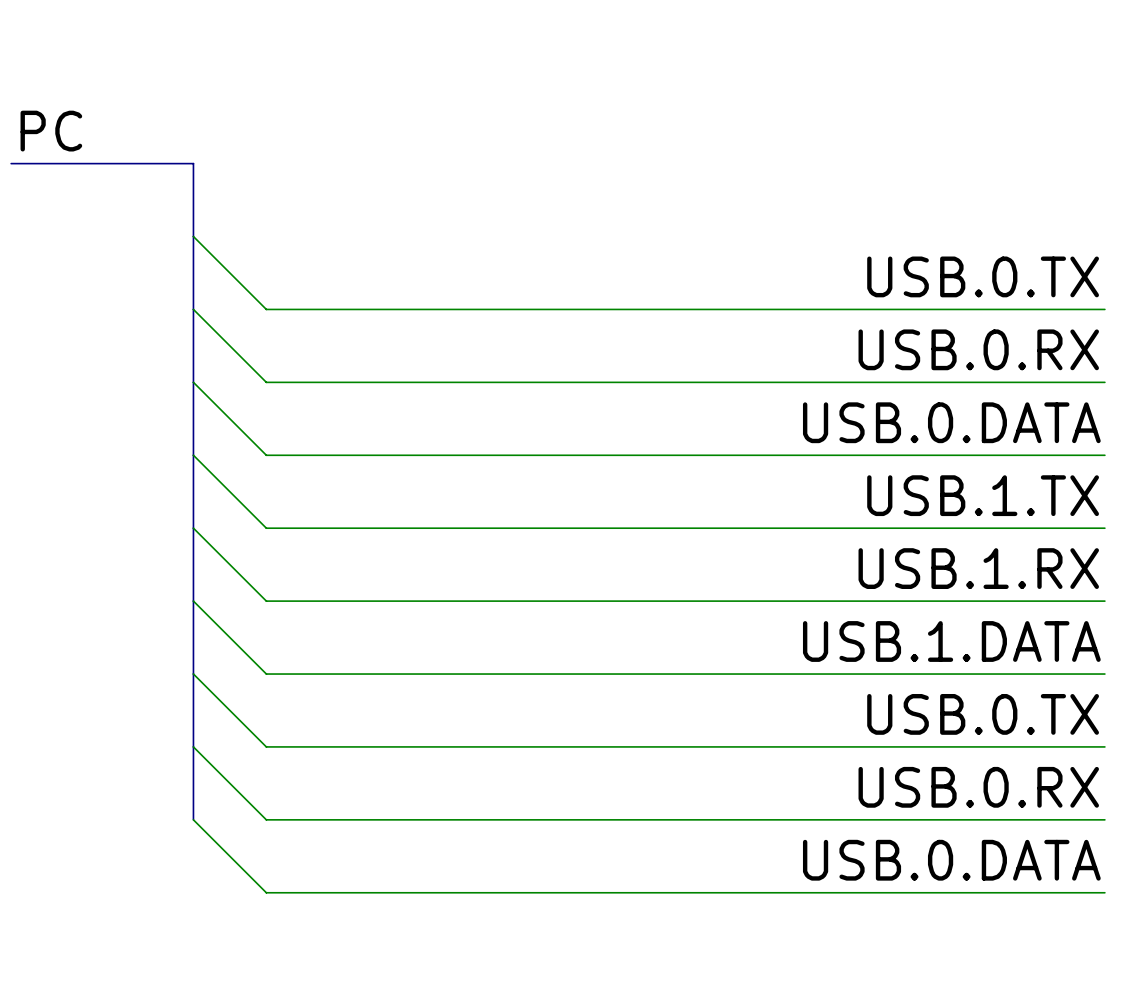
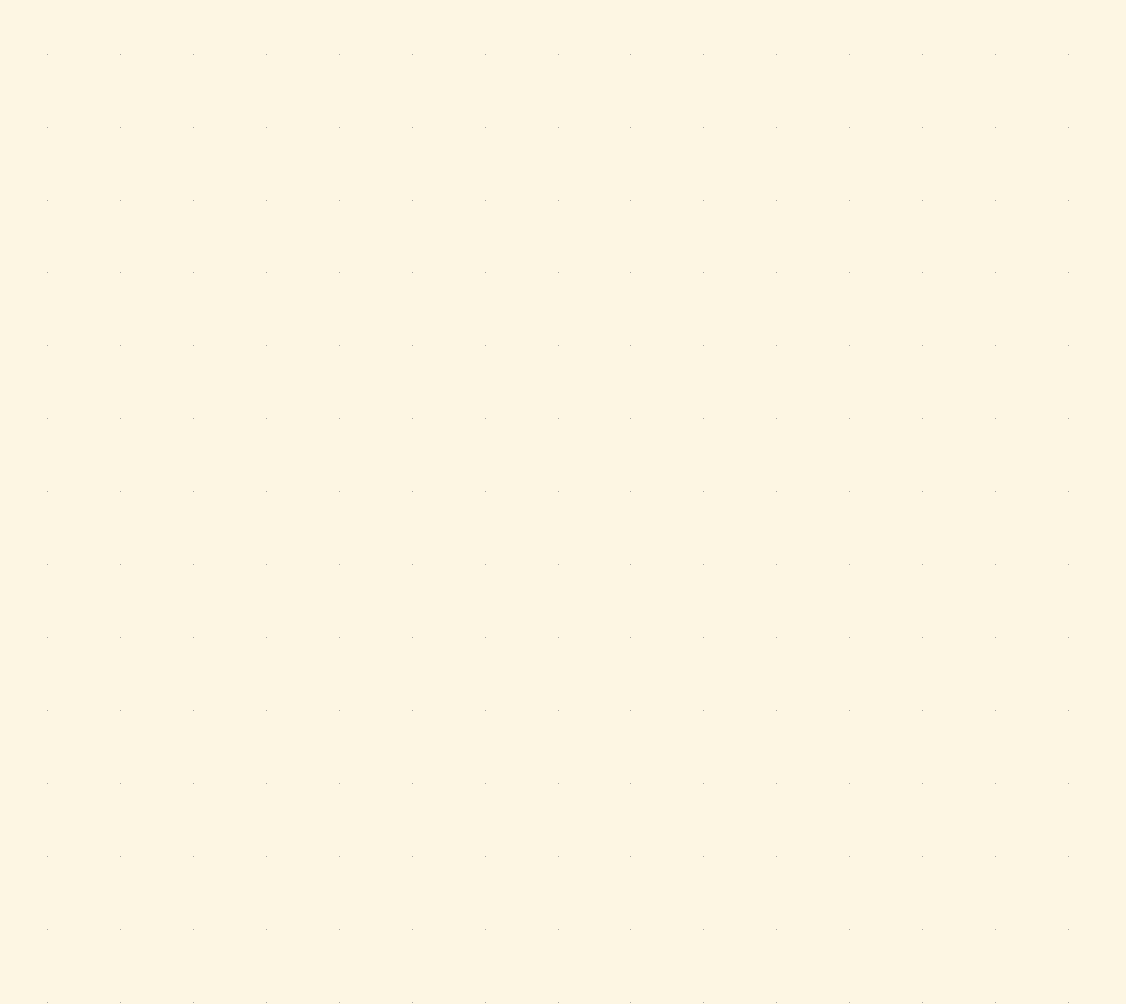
label: PC (51, 131) -> none
bus: (11, 163) (193, 163) (193, 819) -> none
wire: (193, 236) (266, 309) (1104, 309) -> none
label: USB.0.TX (983, 276) -> none
wire: (193, 309) (266, 382) (1104, 382) -> none
label: USB.0.RX (978, 349) -> none
wire: (193, 382) (266, 455) (1104, 455) -> none
label: USB.0.DATA (951, 422) -> none
wire: (193, 455) (266, 528) (1104, 528) -> none
label: USB.1.TX (983, 495) -> none
wire: (193, 528) (266, 601) (1104, 601) -> none
label: USB.1.RX (978, 568) -> none
wire: (193, 601) (266, 674) (1104, 674) -> none
label: USB.1.DATA (951, 641) -> none
wire: (193, 674) (266, 746) (1104, 746) -> none
label: USB.0.TX (983, 714) -> none
wire: (193, 746) (266, 819) (1104, 819) -> none
label: USB.0.RX (978, 787) -> none
wire: (193, 819) (266, 892) (1104, 892) -> none
label: USB.0.DATA (951, 860) -> none

